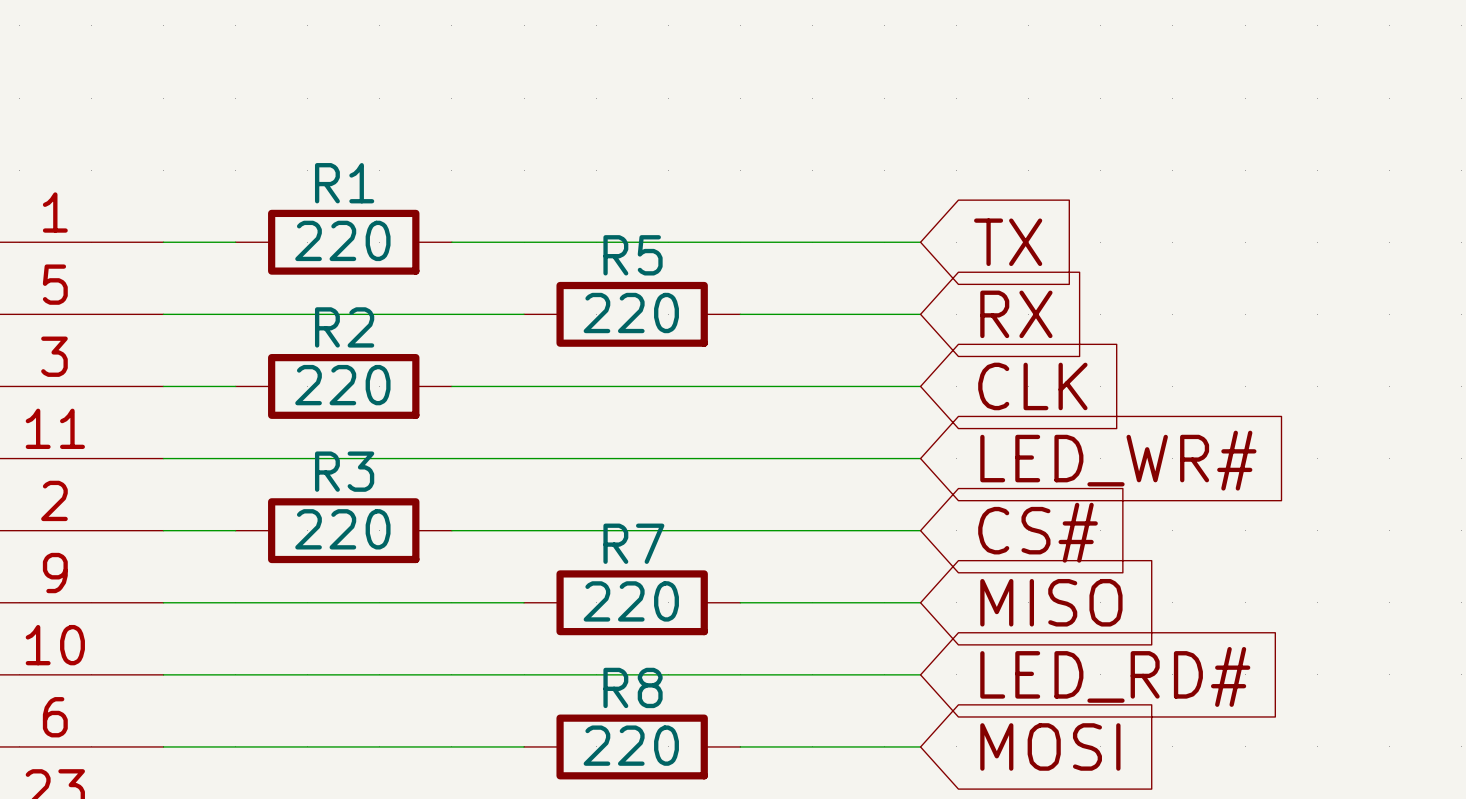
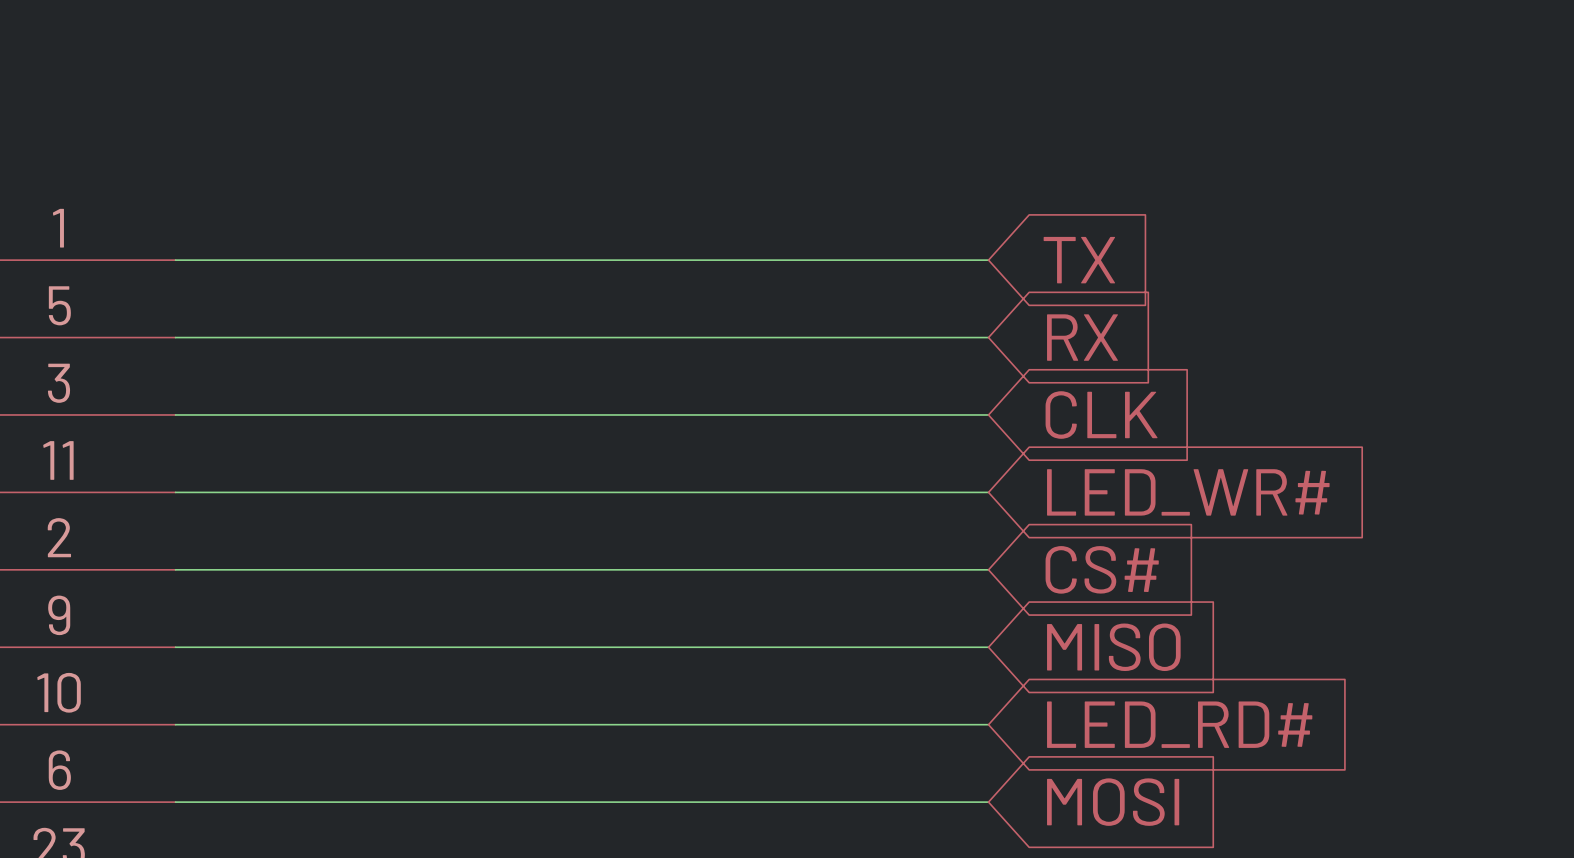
wire: none -> (252, 260) (485, 260)
R1: 220 (343, 242) -> none
wire: none -> (562, 337) (794, 337)
R5: 220 (632, 314) -> none
wire: none -> (252, 414) (485, 414)
R2: 220 (343, 386) -> none
wire: none -> (252, 569) (485, 569)
R3: 220 (343, 530) -> none
wire: none -> (562, 647) (794, 647)
R7: 220 (632, 602) -> none
wire: none -> (562, 802) (794, 802)
R8: 220 (632, 746) -> none

